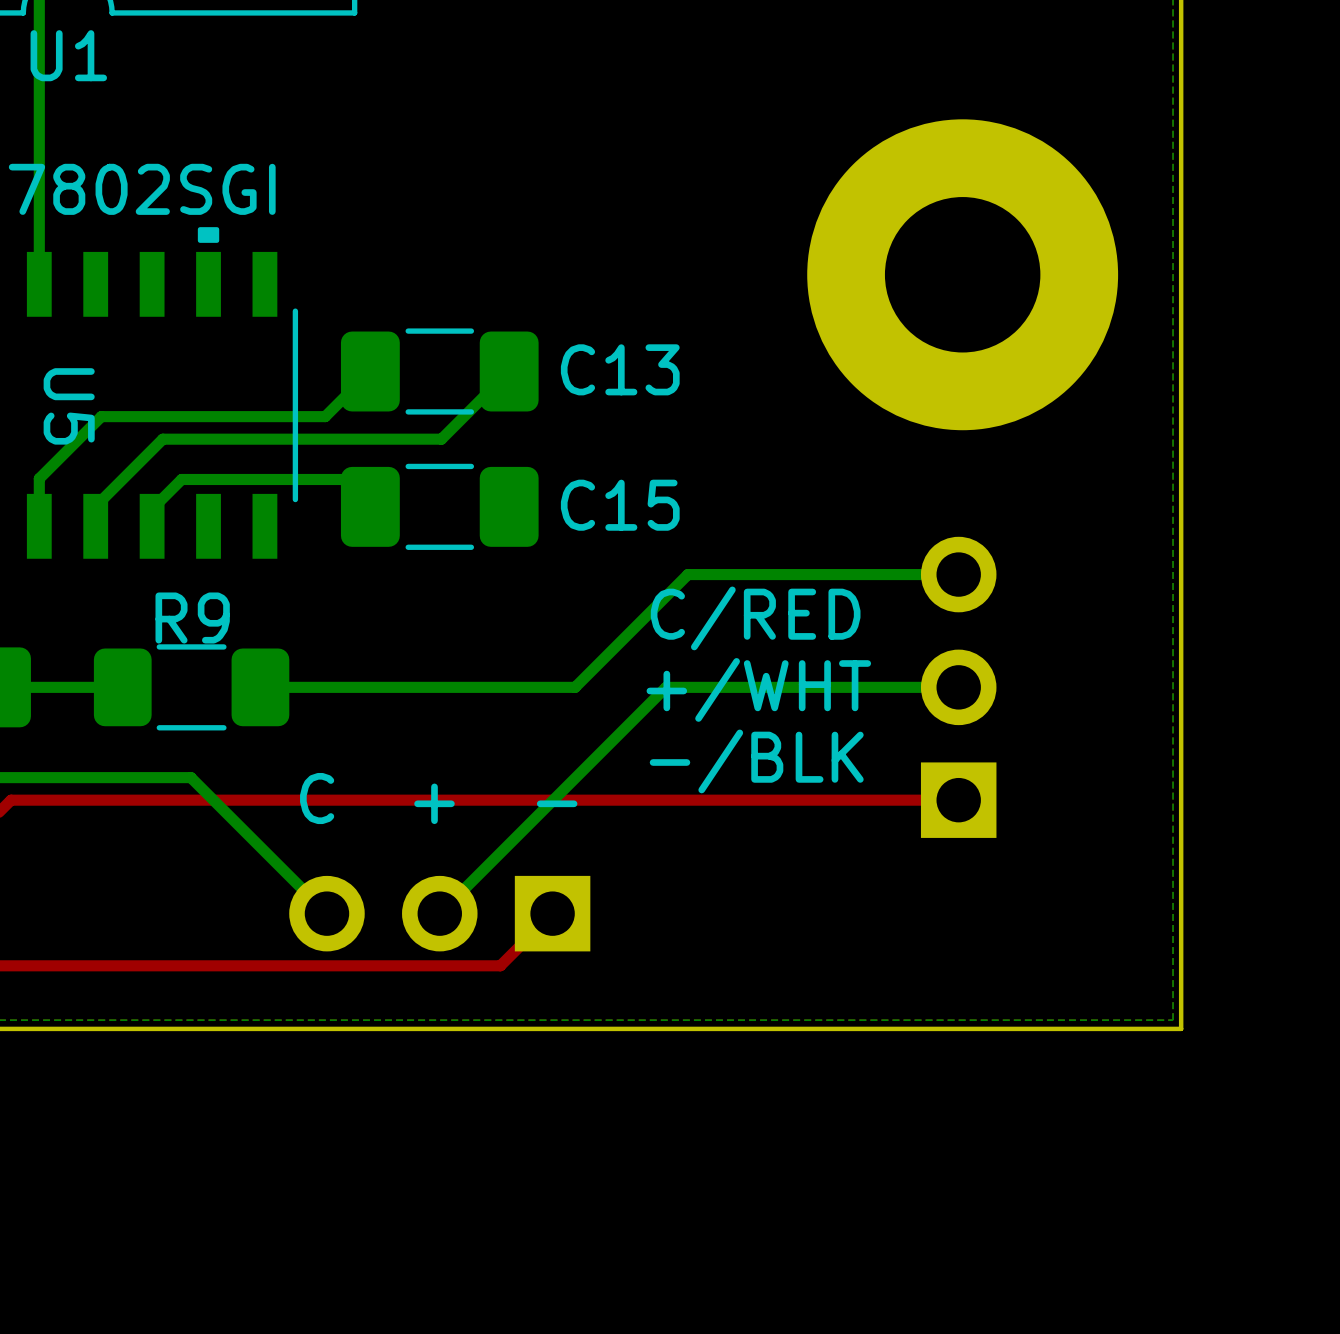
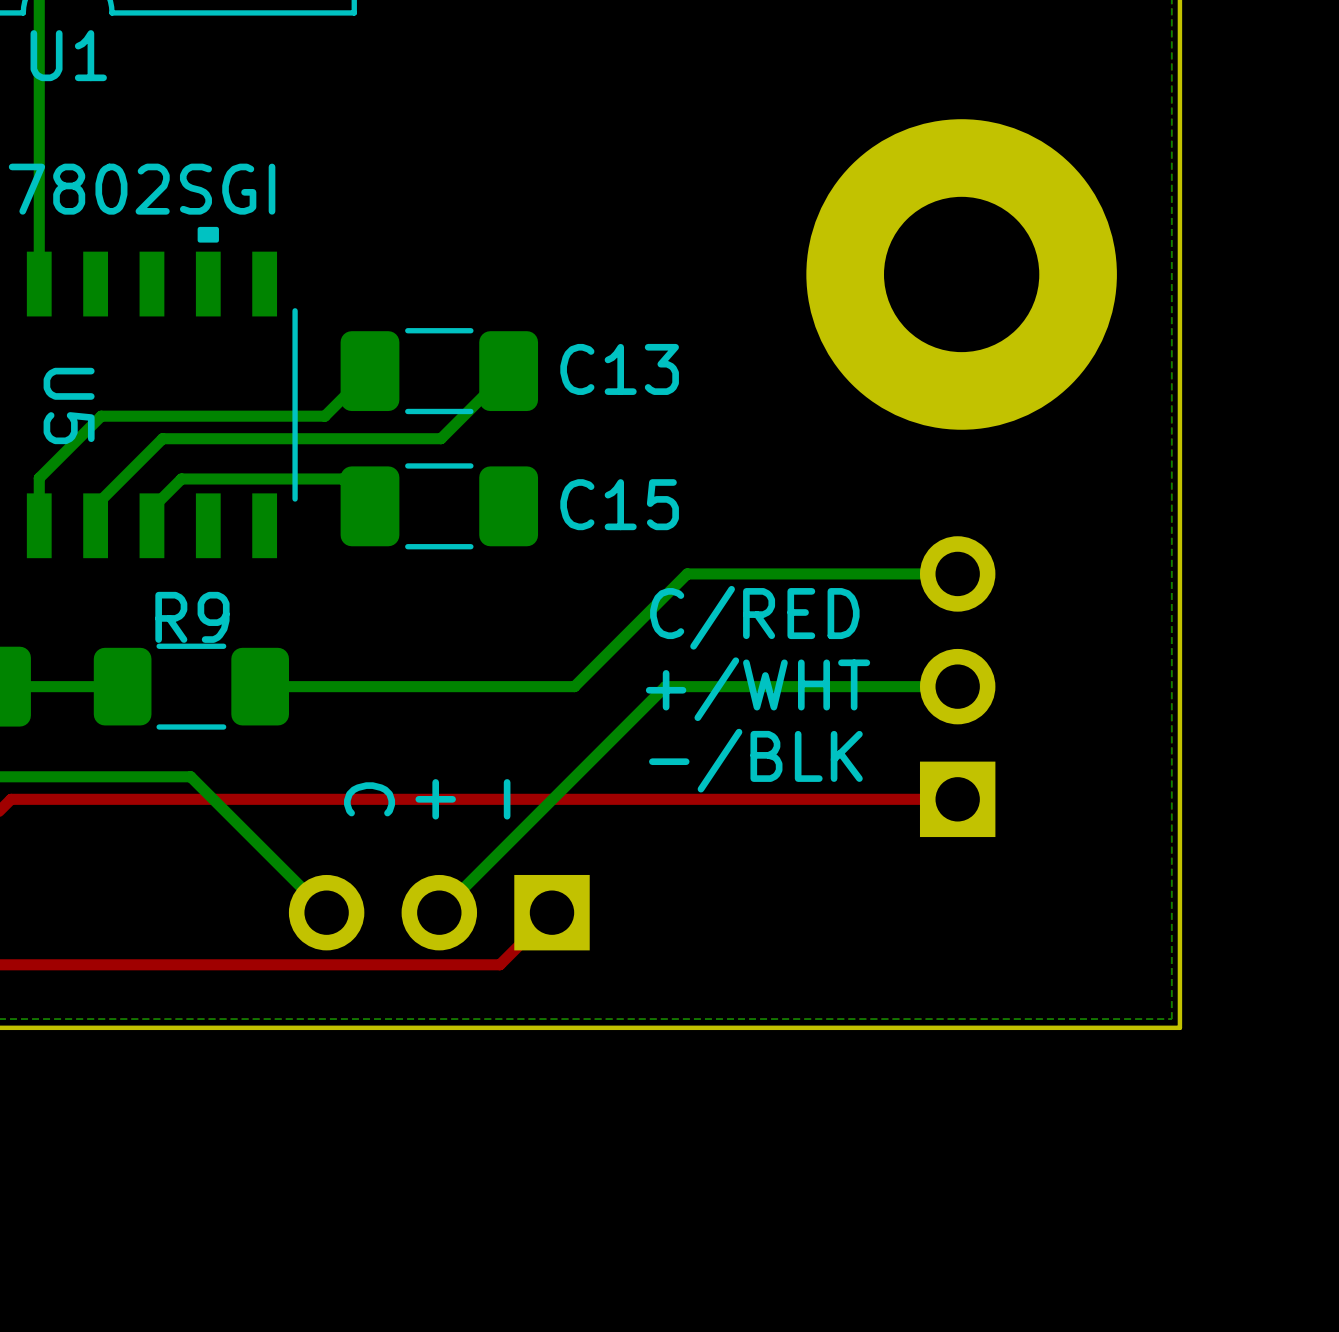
text: C + - (438, 798) -> + (435, 799)
text: none -> C (369, 799)
text: none -> - (507, 799)

